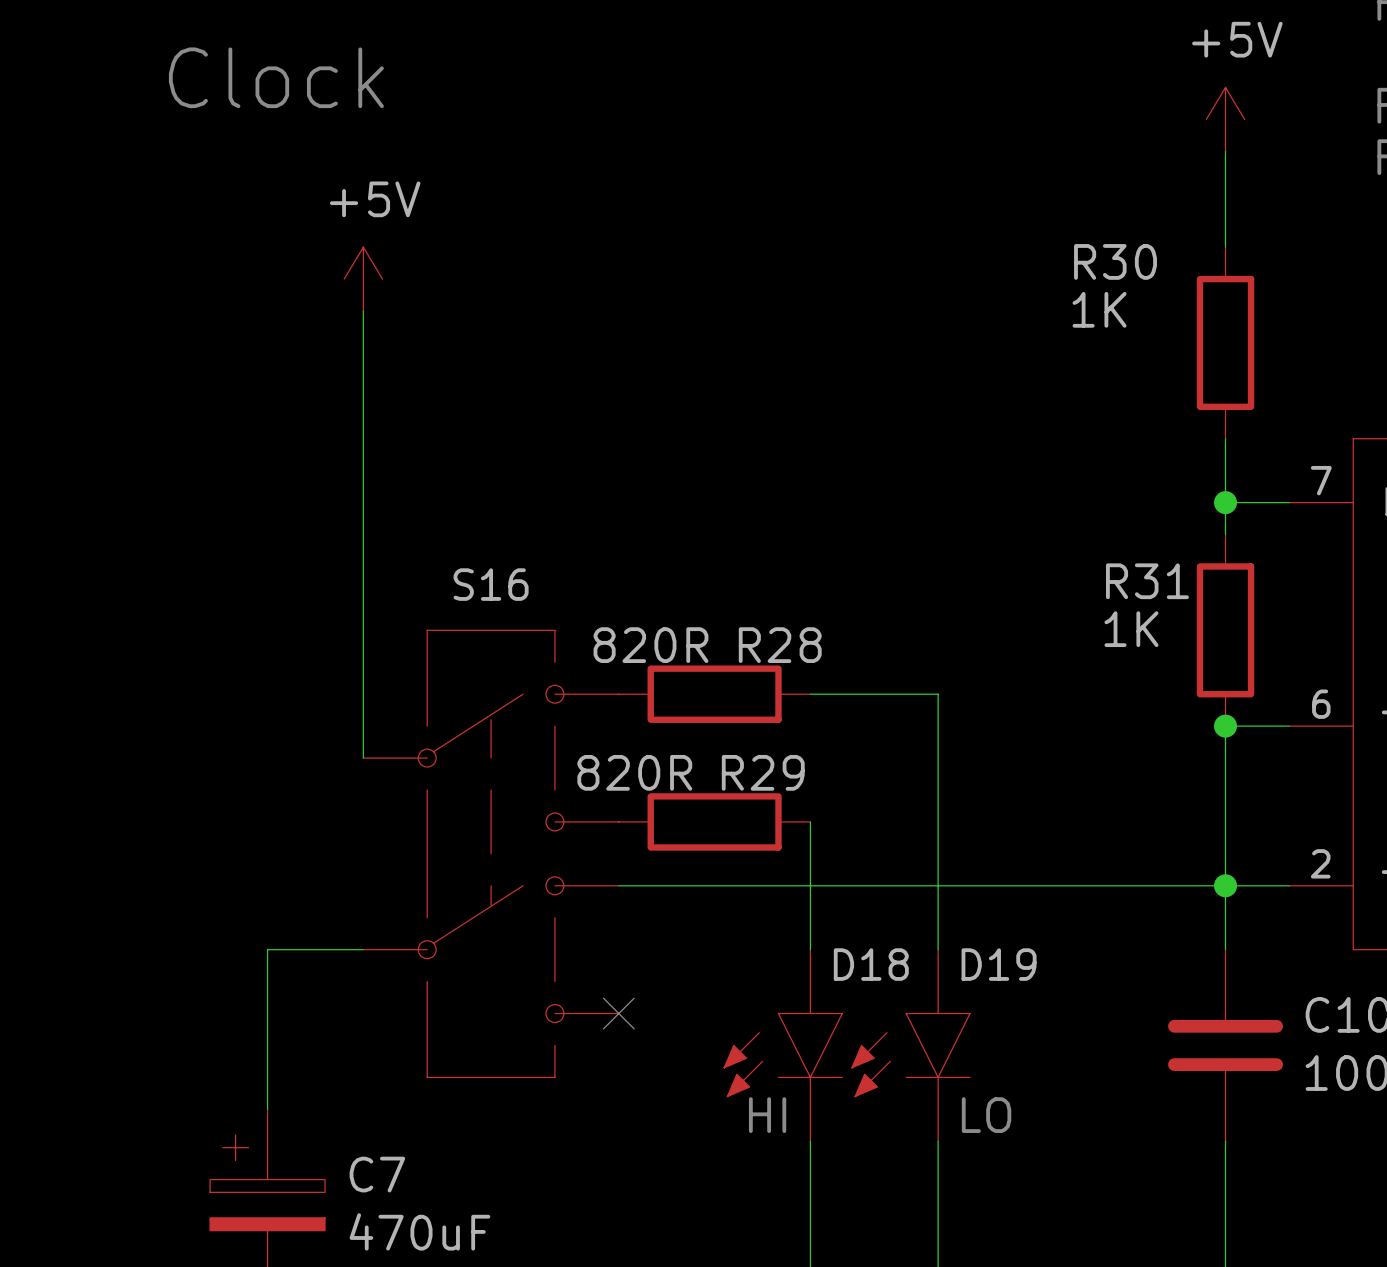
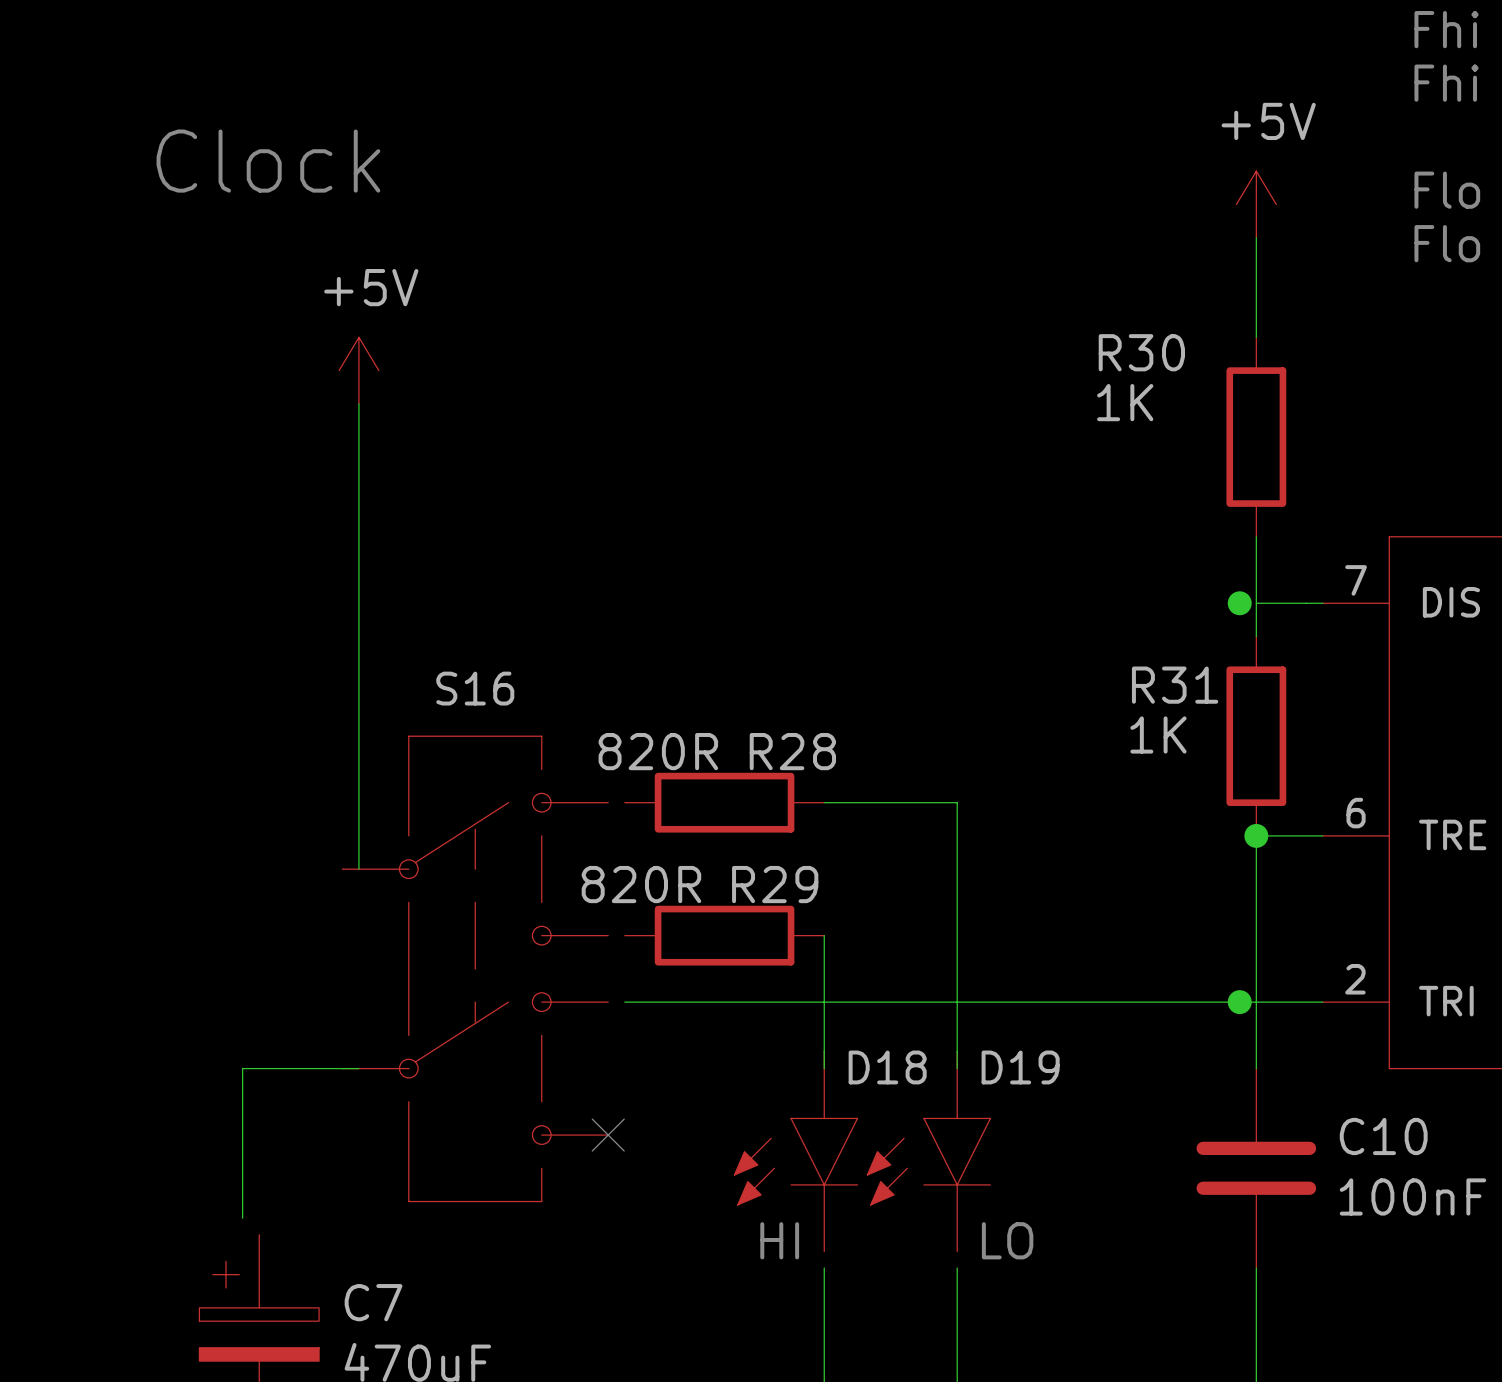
junction position: (1225, 502) -> (1239, 603)
S16 position: (491, 853) -> (475, 968)
junction position: (1225, 885) -> (1239, 1002)
wire: (267, 949) (267, 1109) -> (259, 1068) (242, 1068) (242, 1218)
no-connect mark position: (618, 1013) -> (608, 1135)
D18 position: (783, 1045) -> (796, 1151)
D19 position: (910, 1045) -> (928, 1151)

